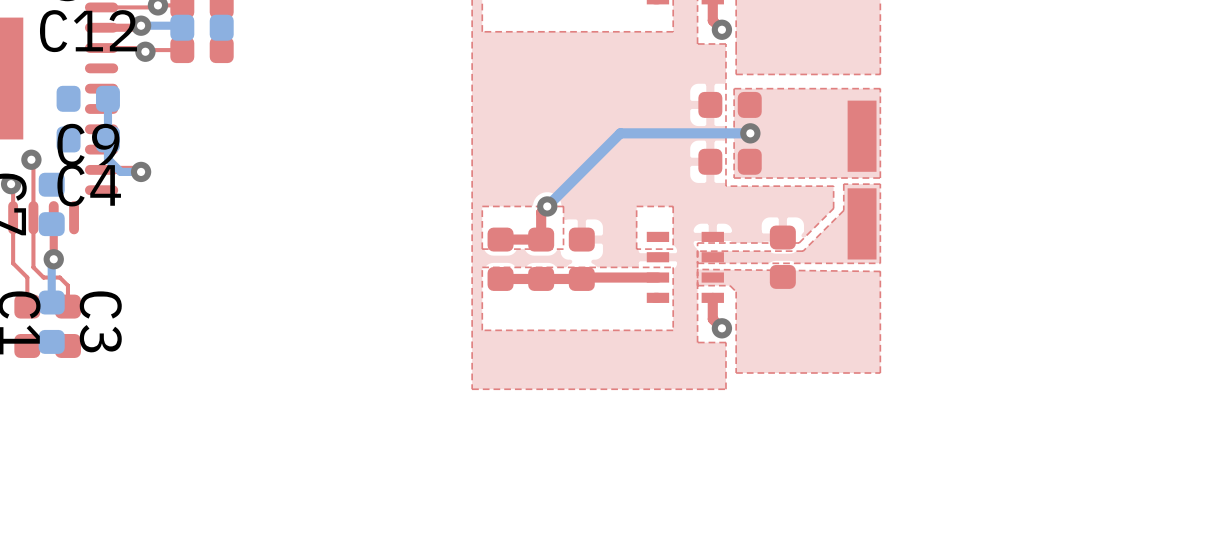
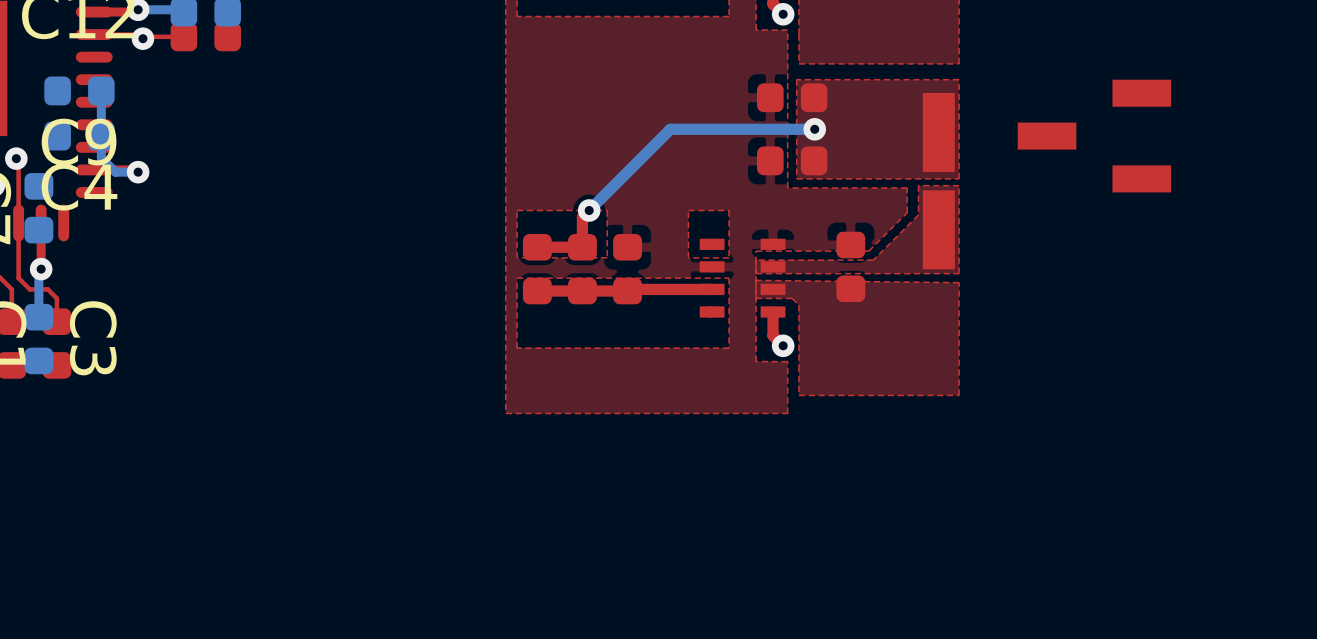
part: none -> (1094, 136)

